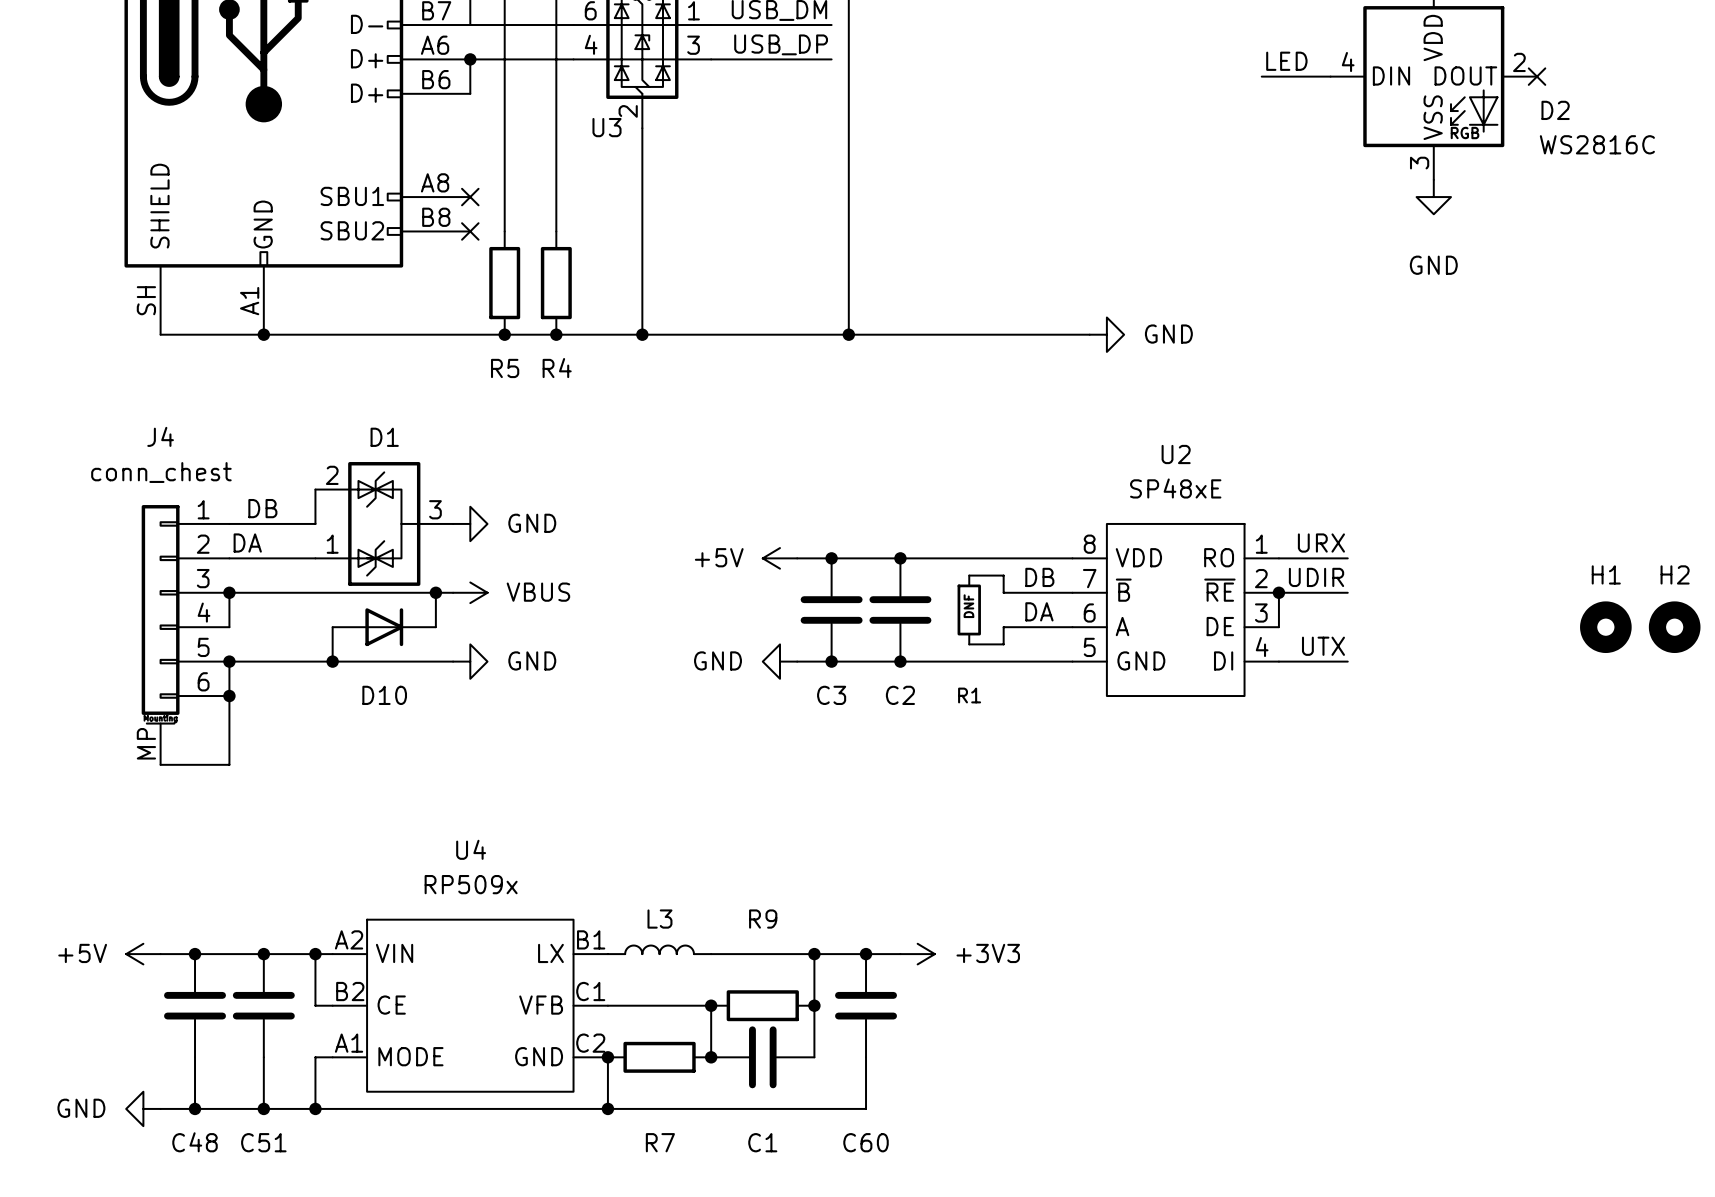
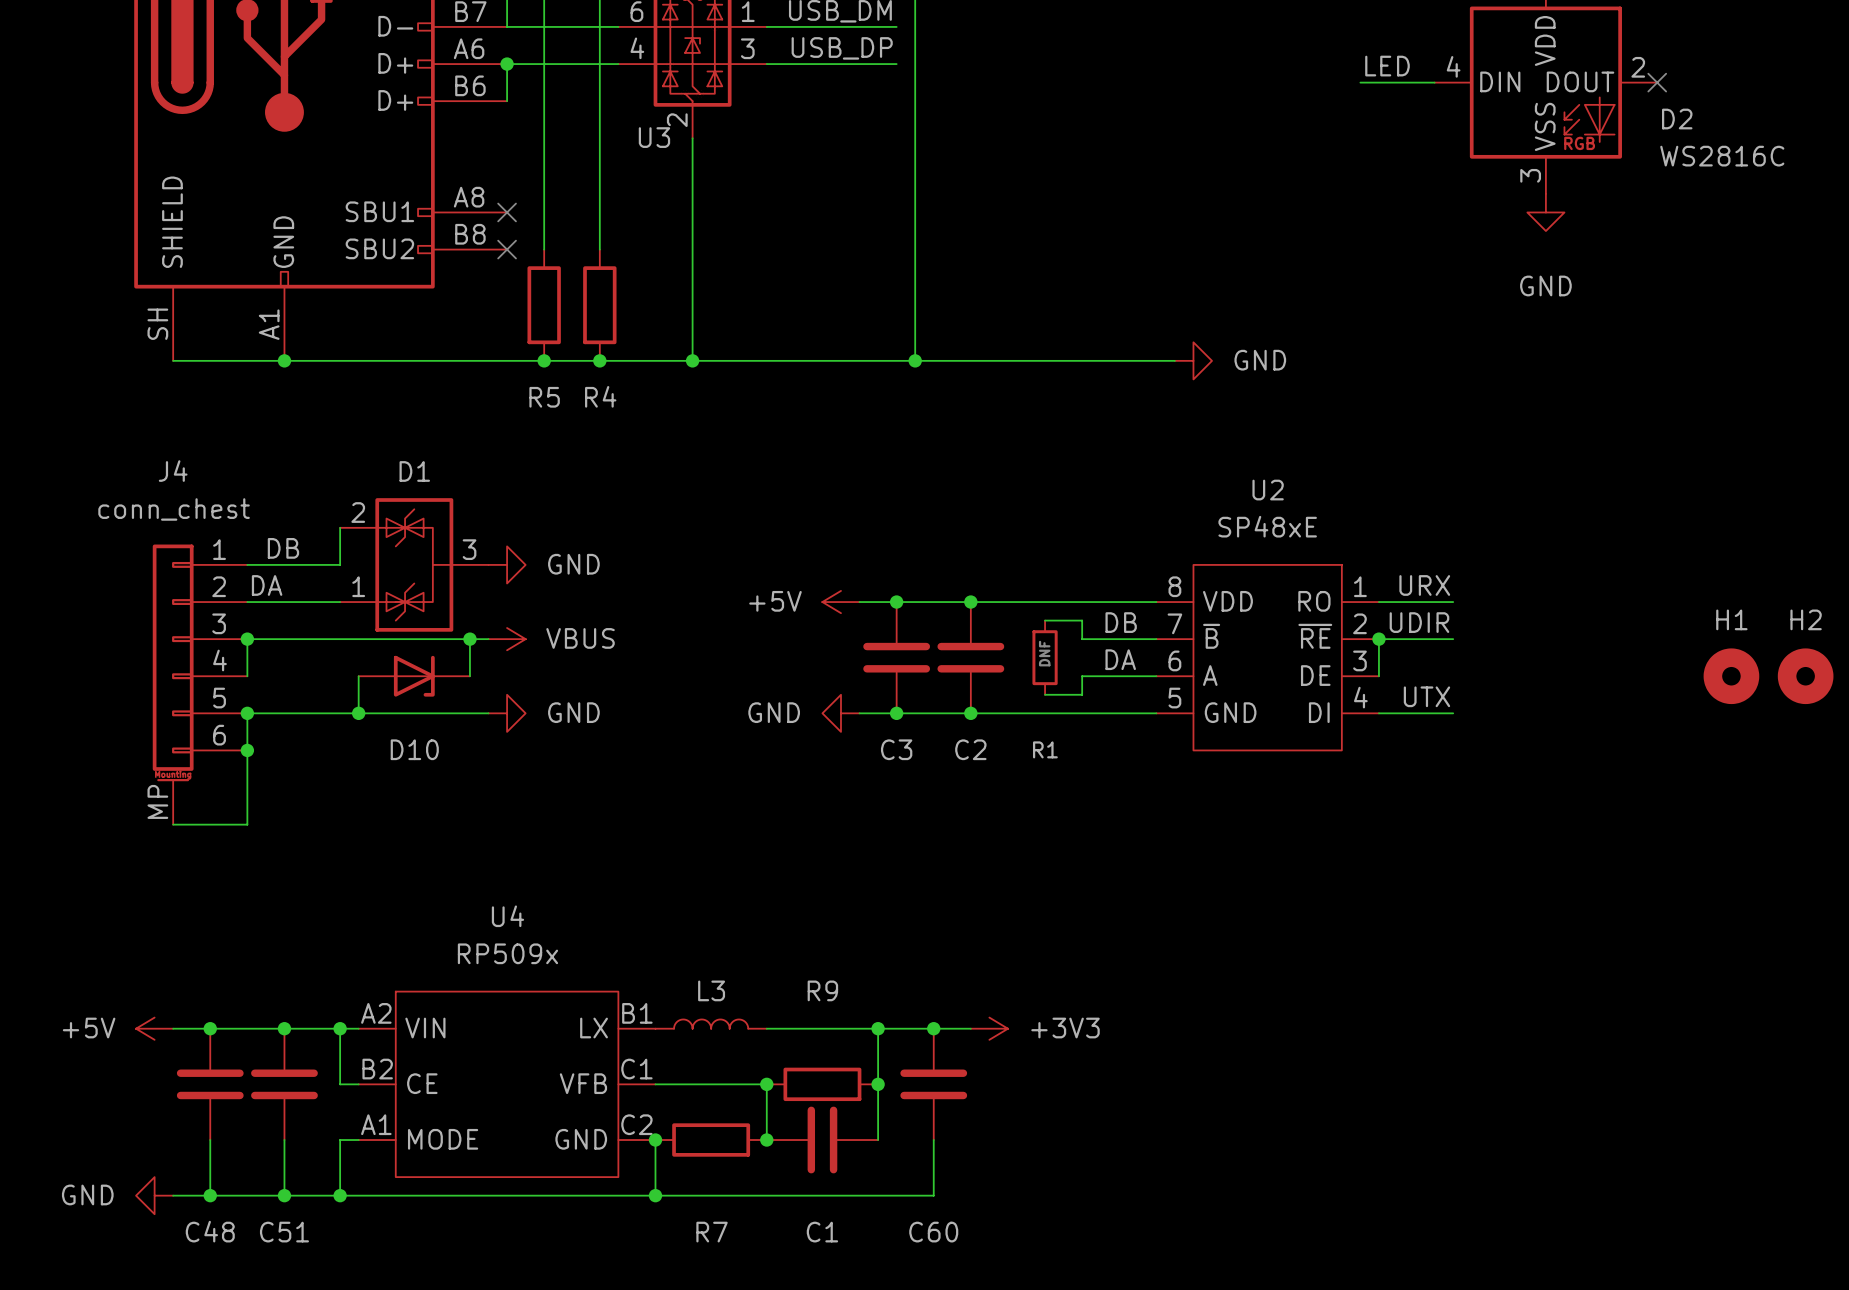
D10 symbol: [332, 608, 436, 647] -> [358, 655, 470, 697]

